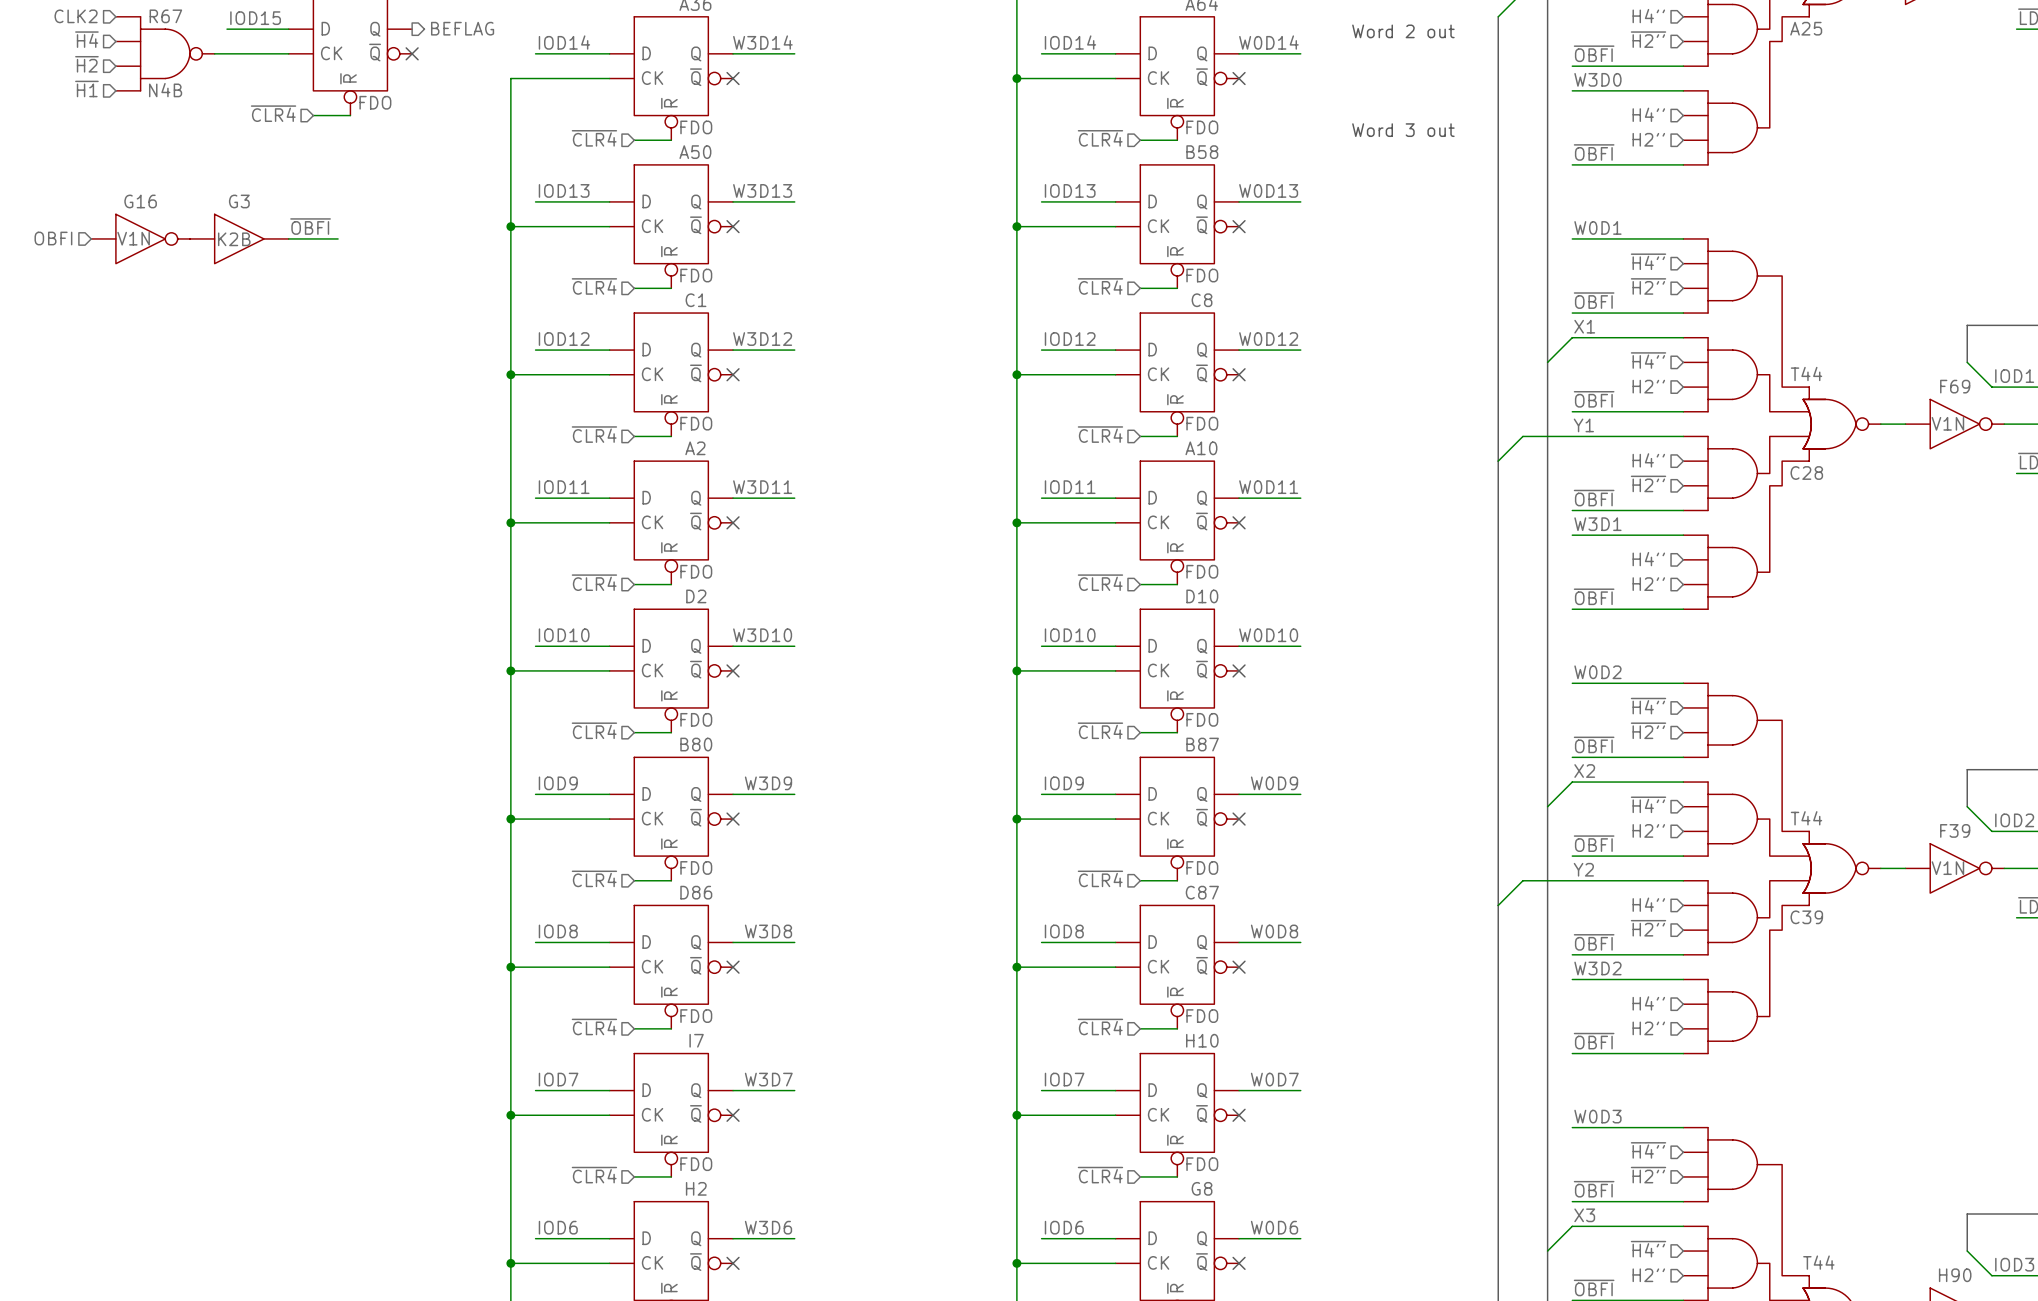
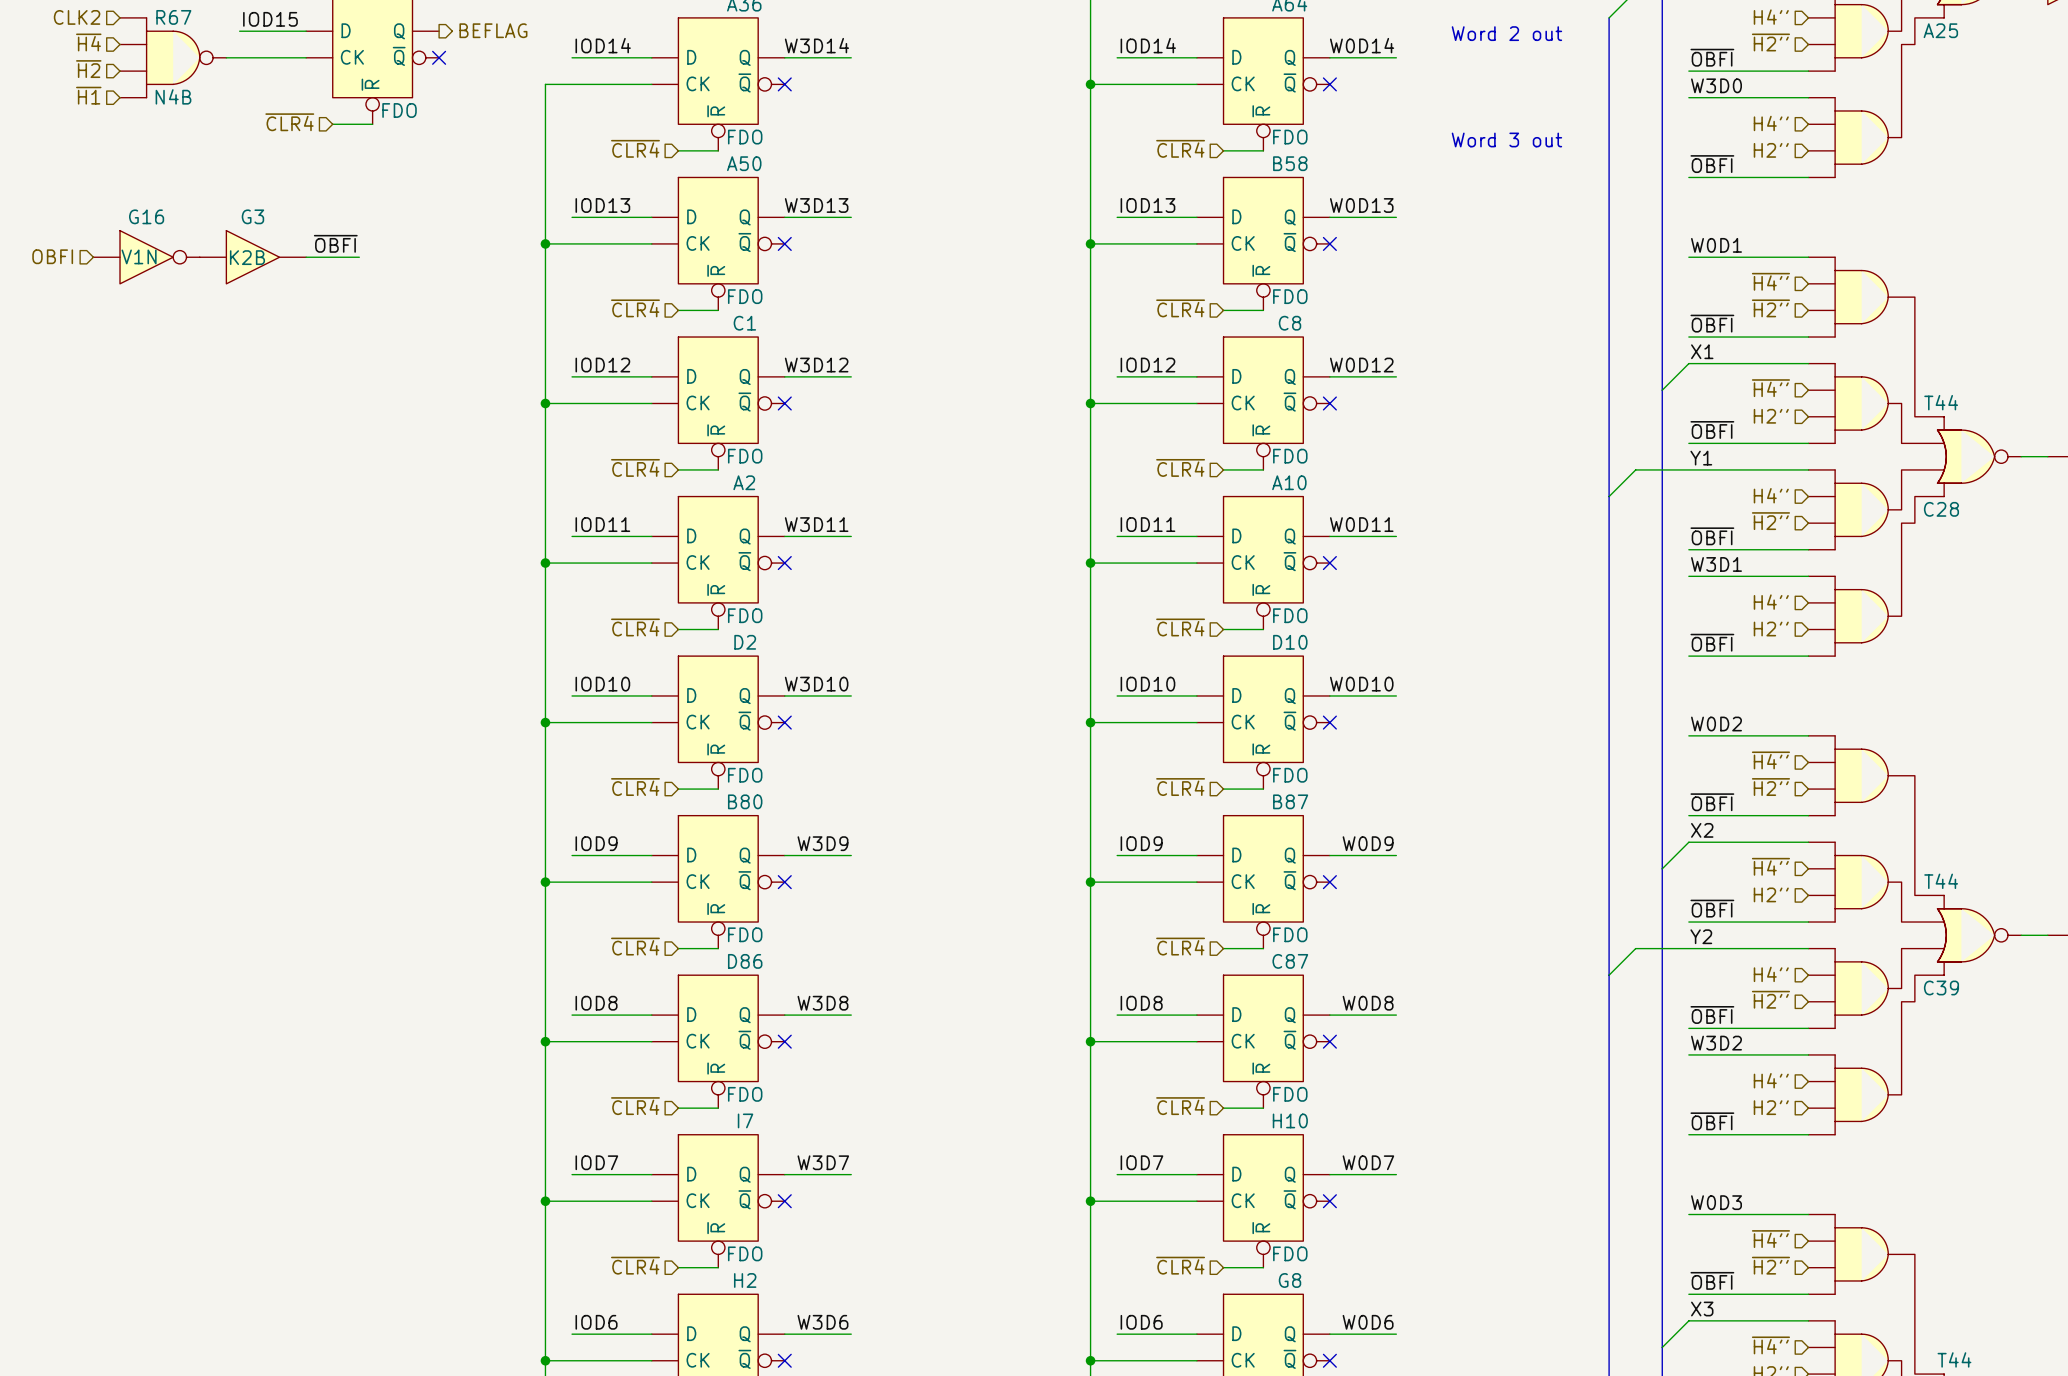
label position: ~{OBFI} (310, 226) -> ~{OBFI} (335, 243)

